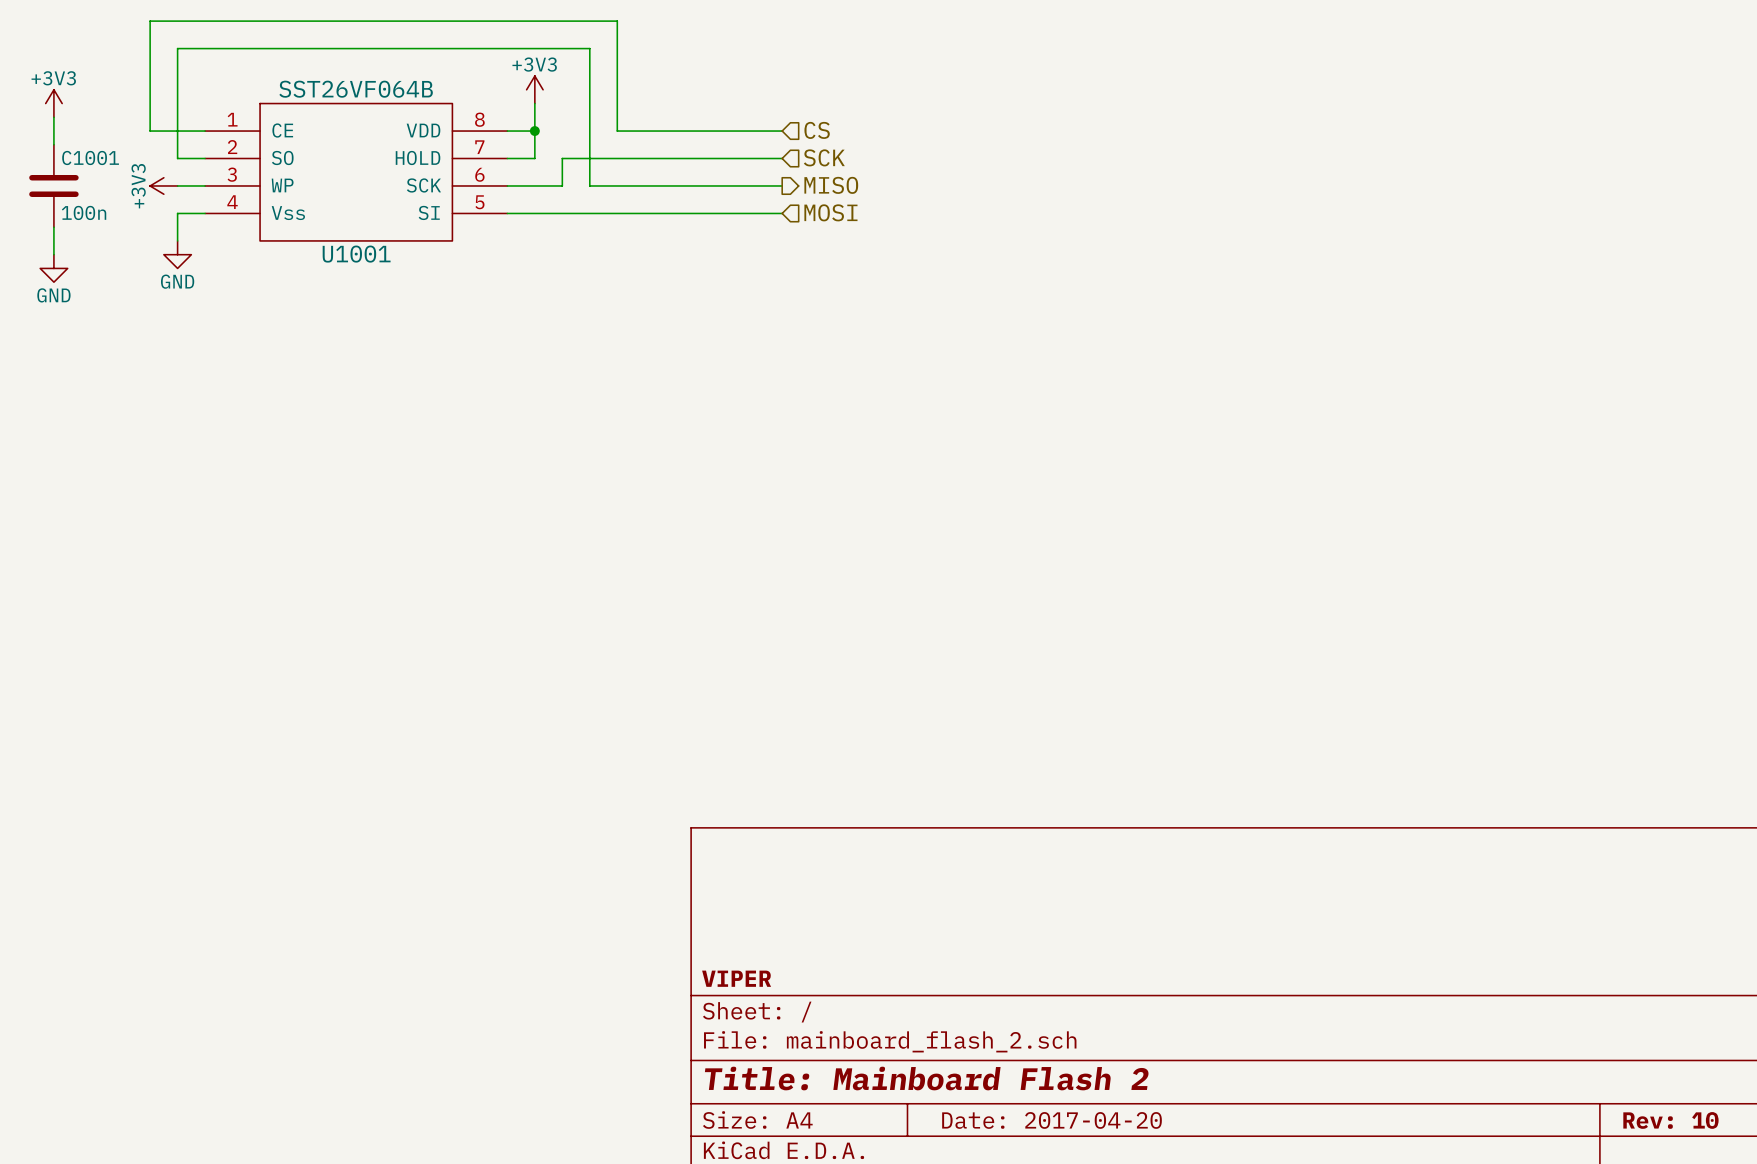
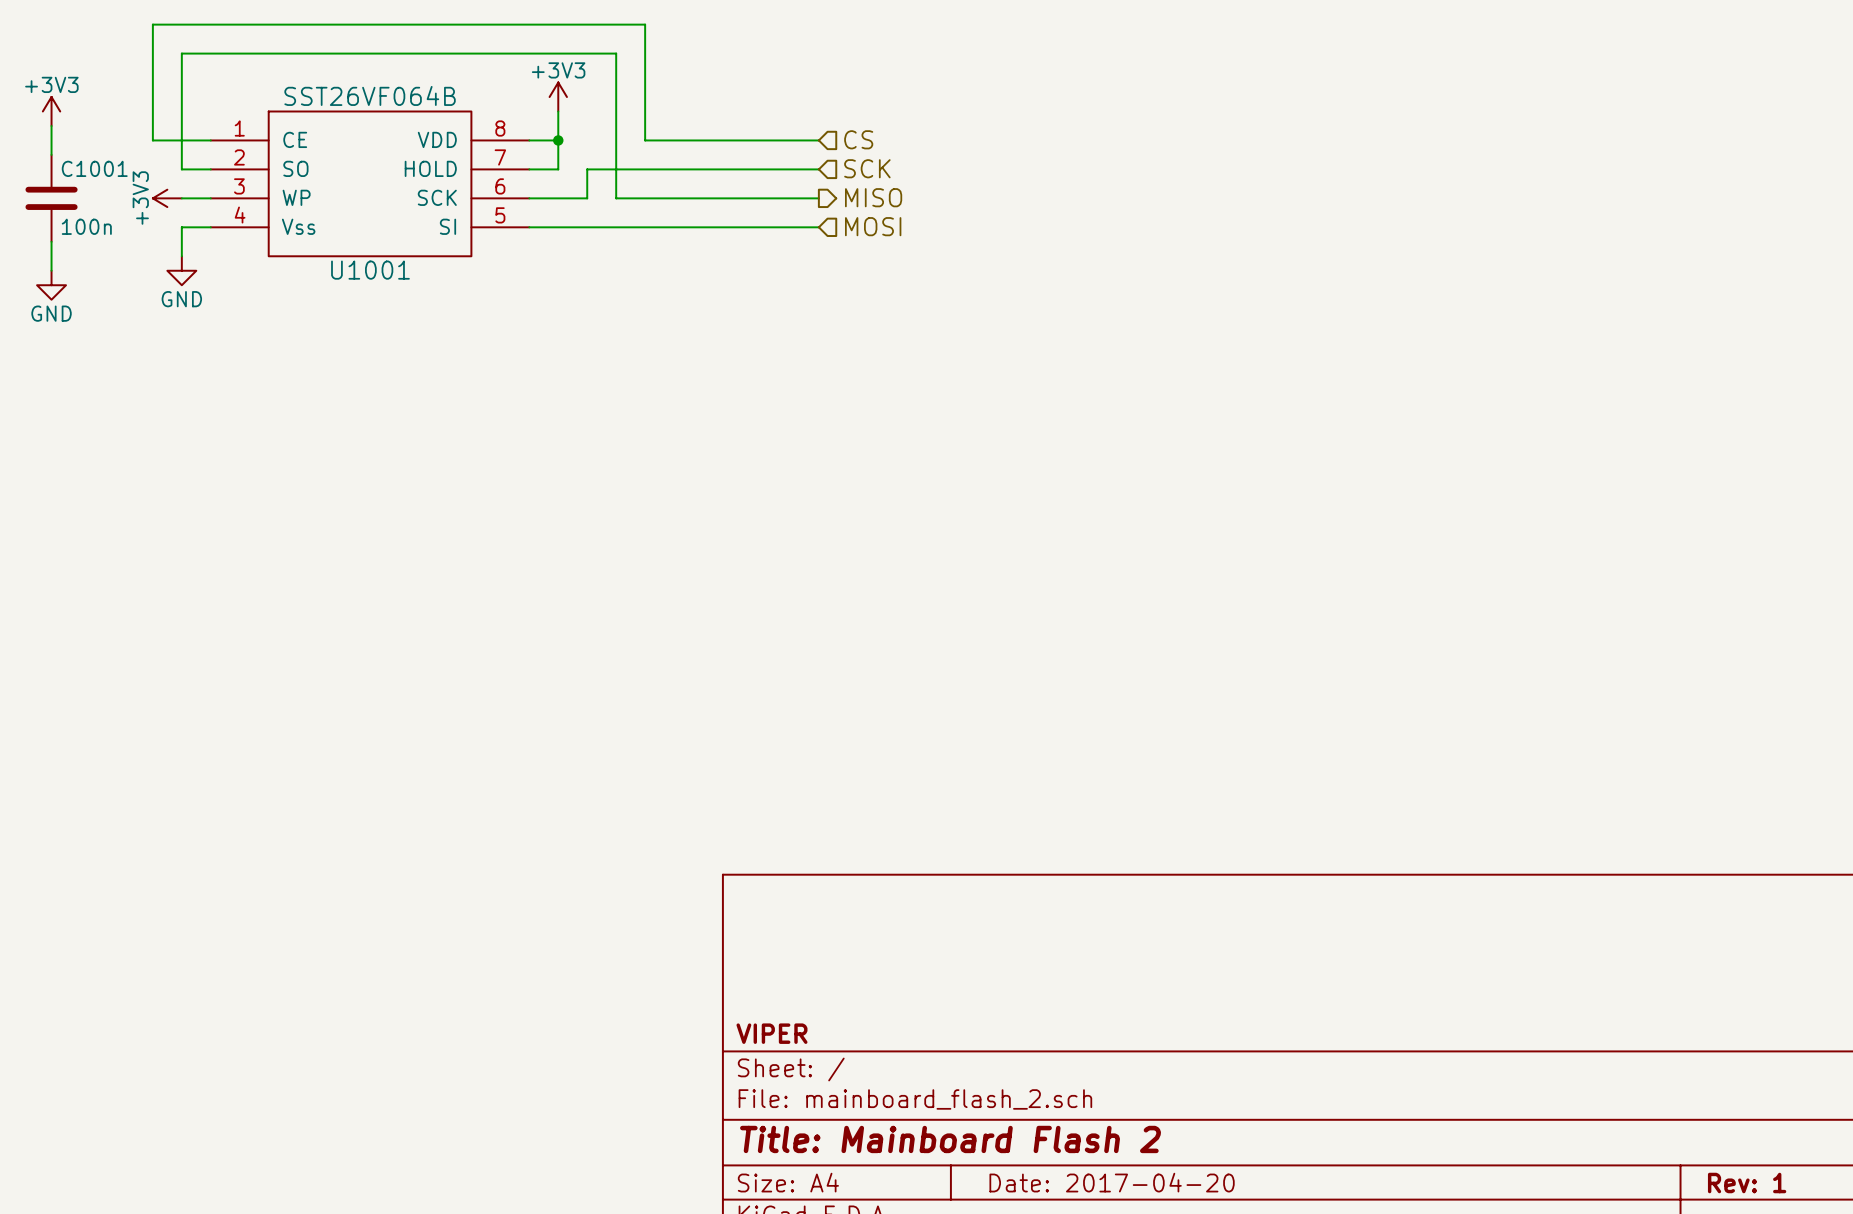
title block: Rev: 10 (1670, 1120) -> Rev: 1 (1747, 1183)

